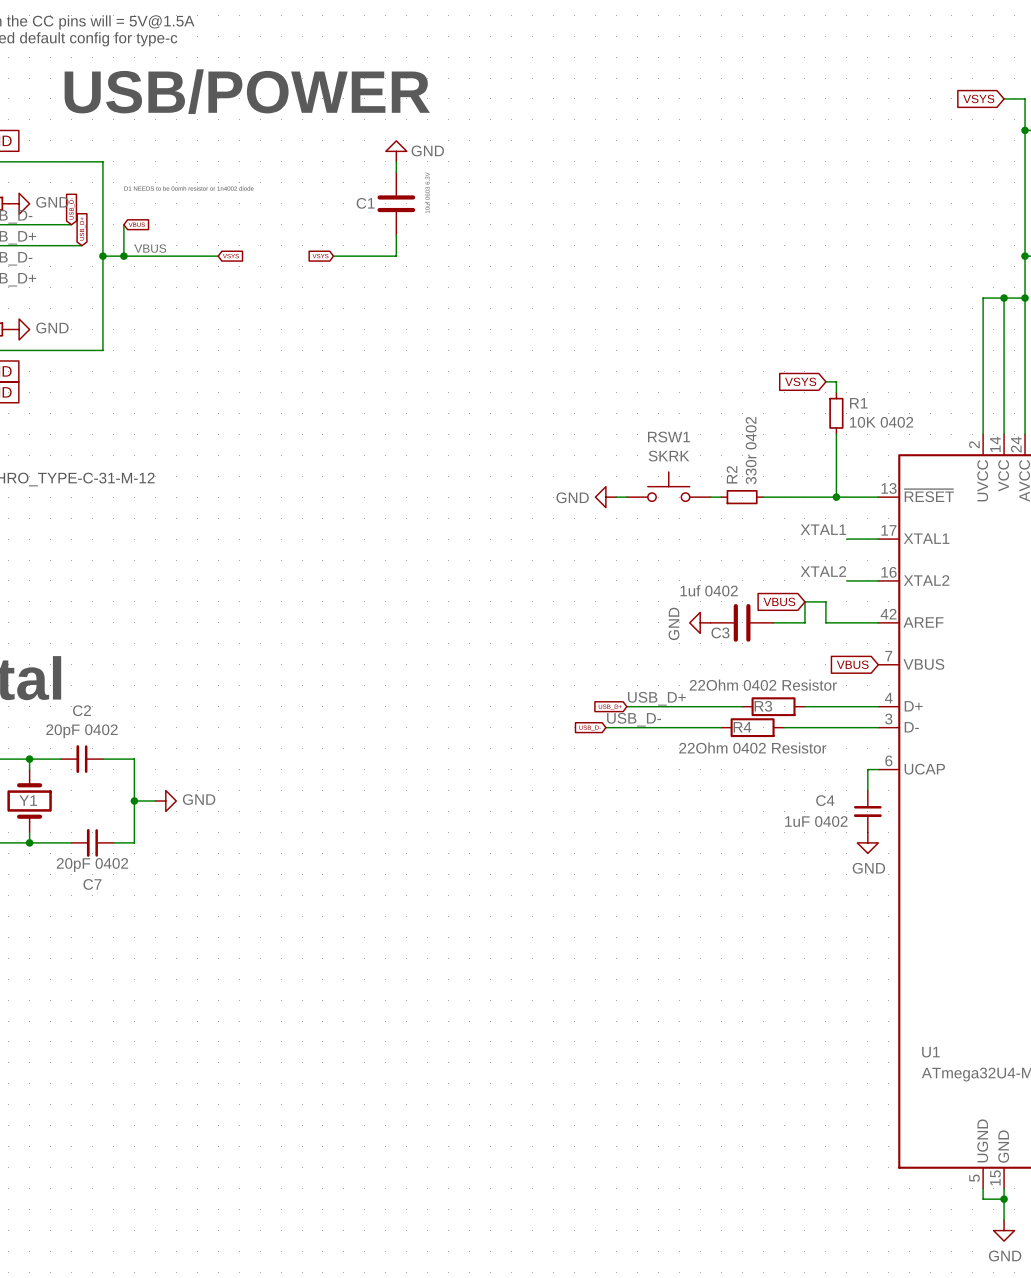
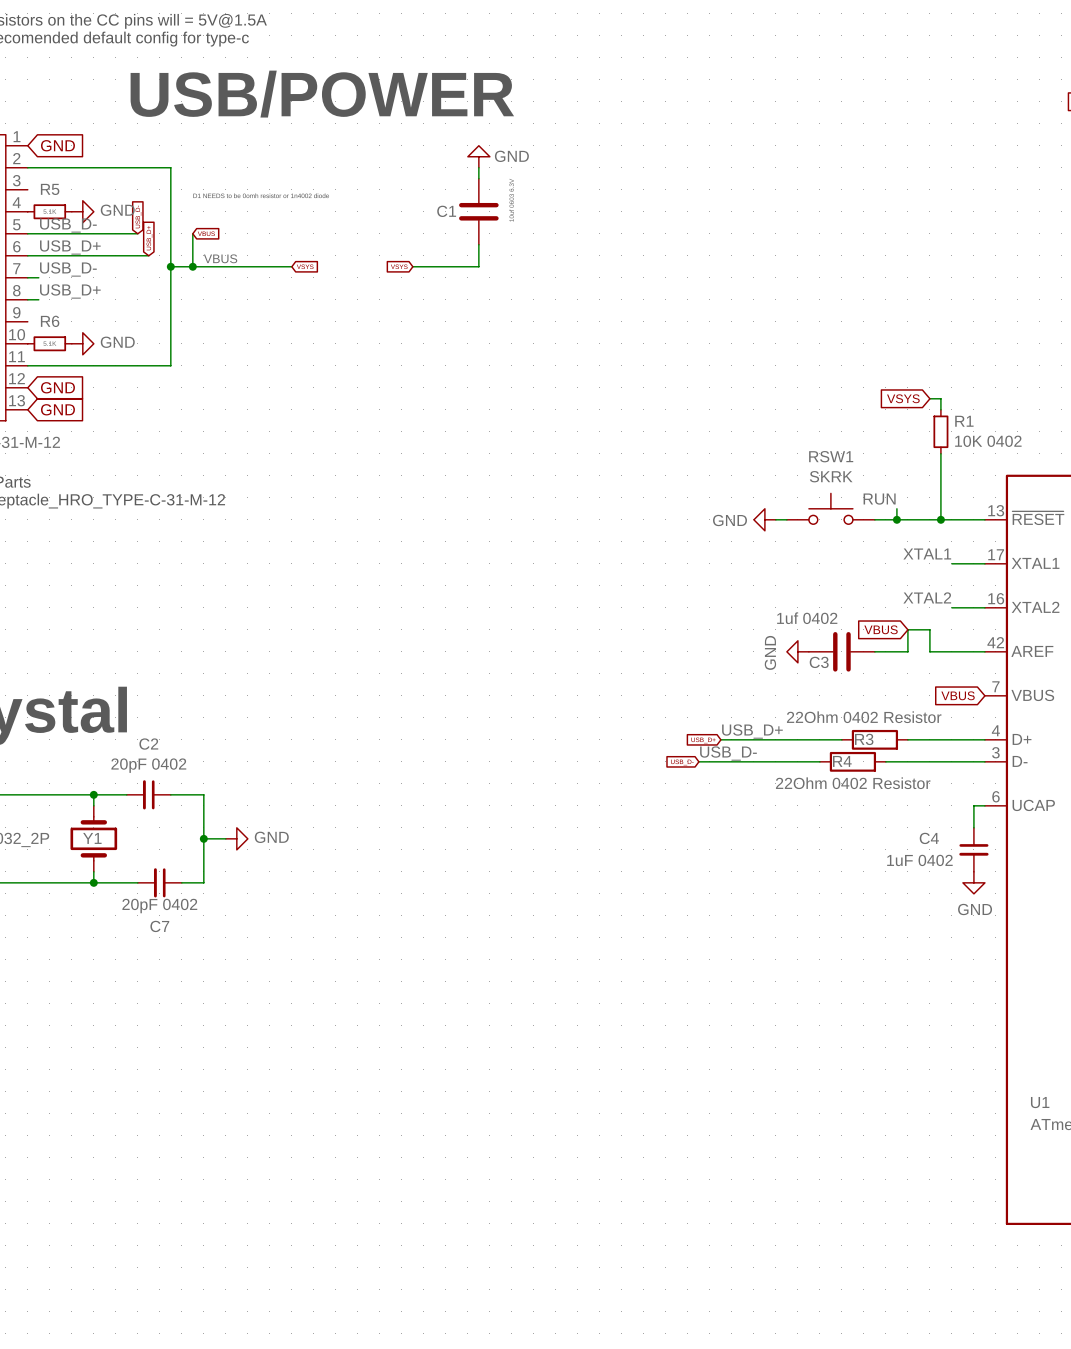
label: none -> RUN (879, 499)
RSW1 position: (668, 486) -> (830, 508)
wire: none -> (896, 508) (896, 519)
power symbol position: GND (605, 497) -> GND (764, 519)
wire: (616, 497) (626, 497) -> none
wire: (710, 497) (721, 497) -> (775, 519) (786, 519)
R2: 330r 0402 (742, 497) -> none
junction: none -> (896, 519)

